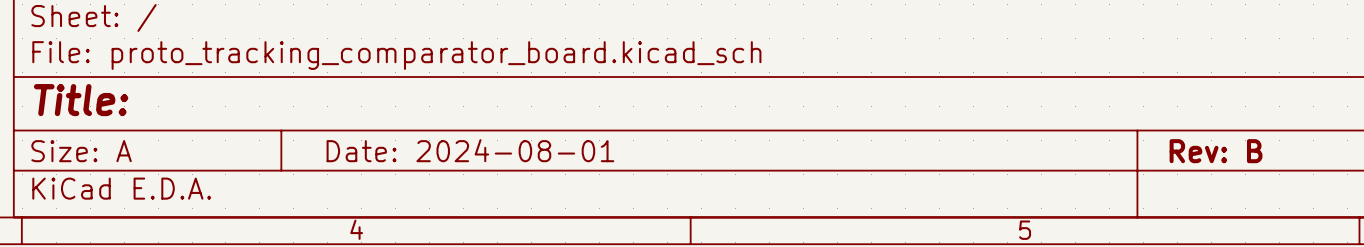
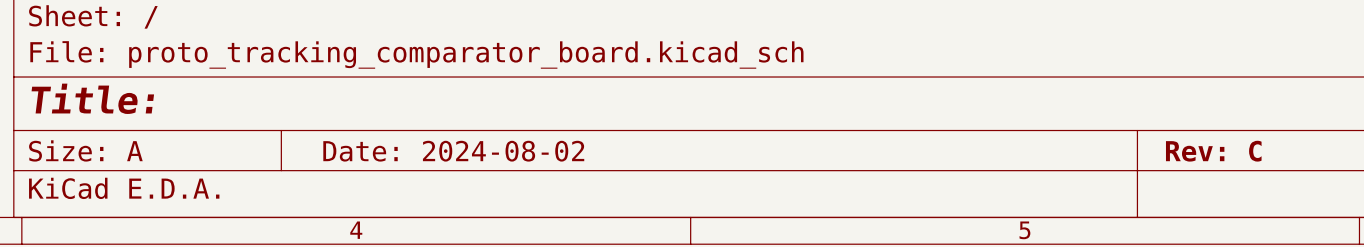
title block: Date: 2024-08-01 (470, 150) -> Date: 2024-08-02 (453, 151)
title block: Rev: B (1216, 151) -> Rev: C (1213, 151)

